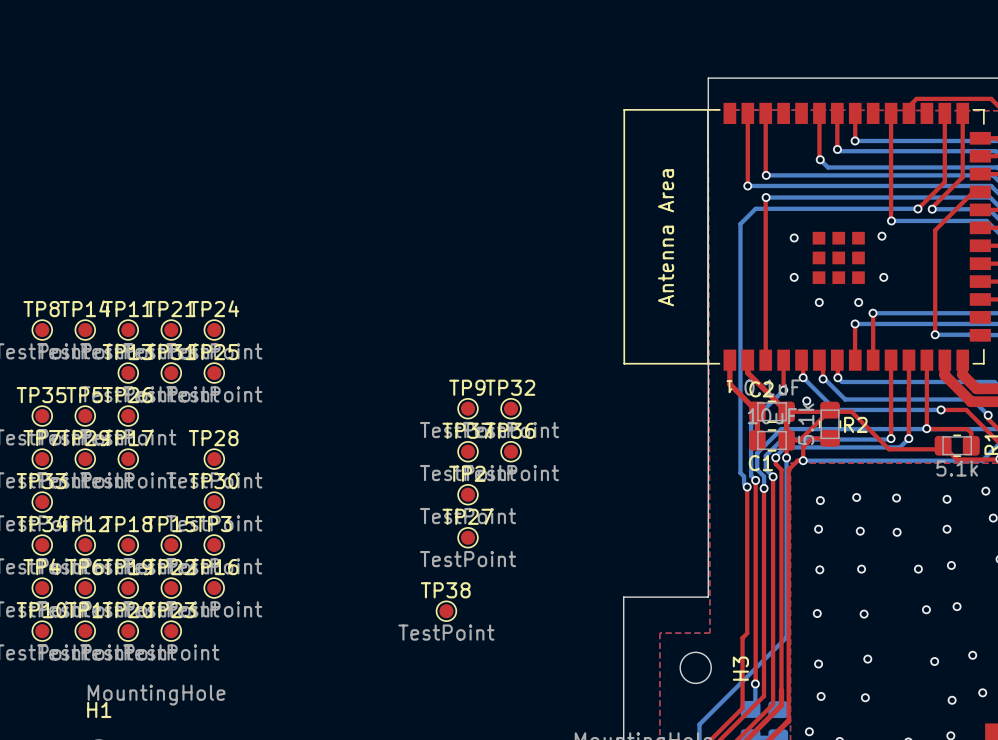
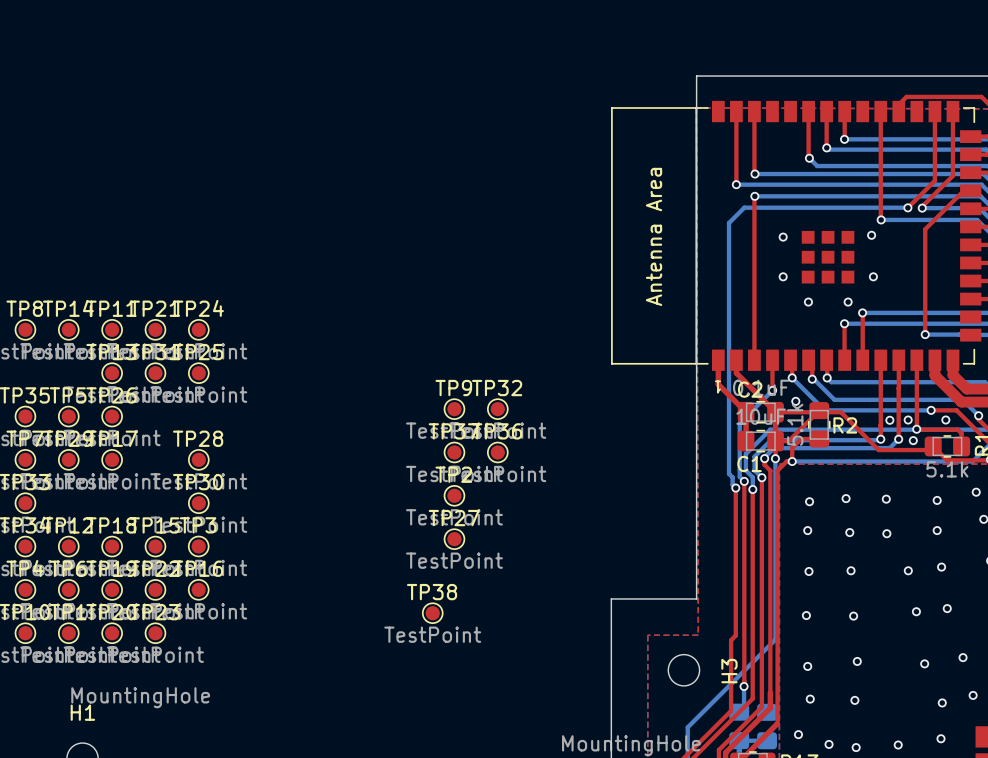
via: none -> (889, 420)
via: none -> (908, 420)
via: none -> (945, 420)
via: none -> (913, 440)

